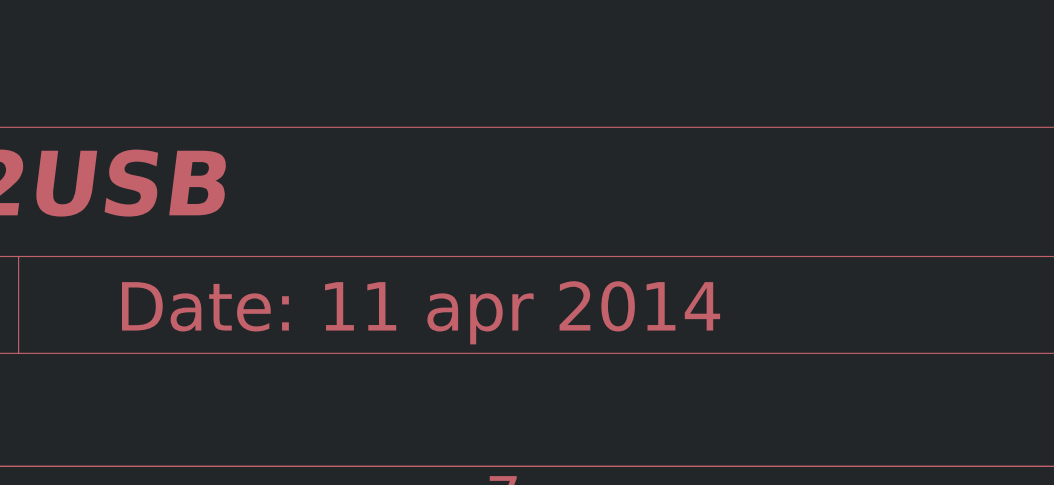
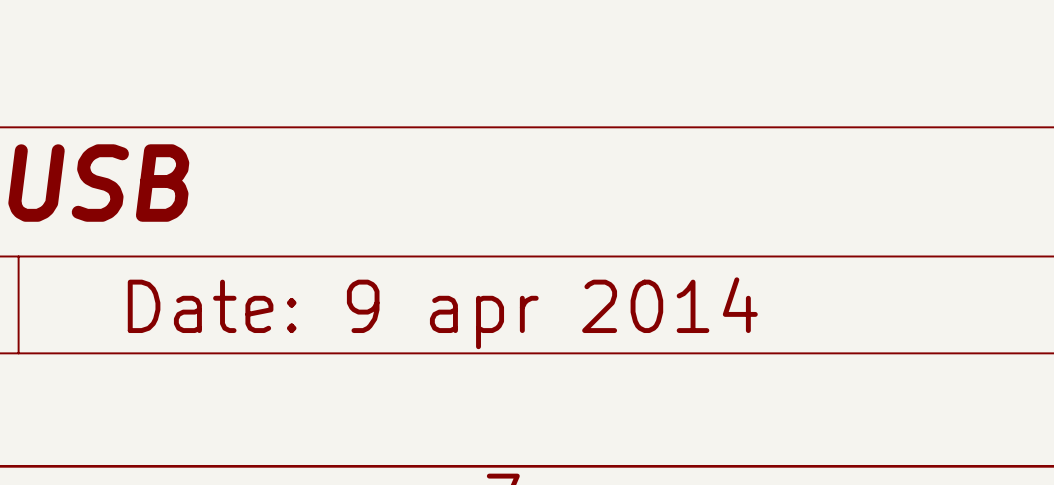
title block: Date: 11 apr 2014 (421, 312) -> Date: 9 apr 2014 (442, 313)

